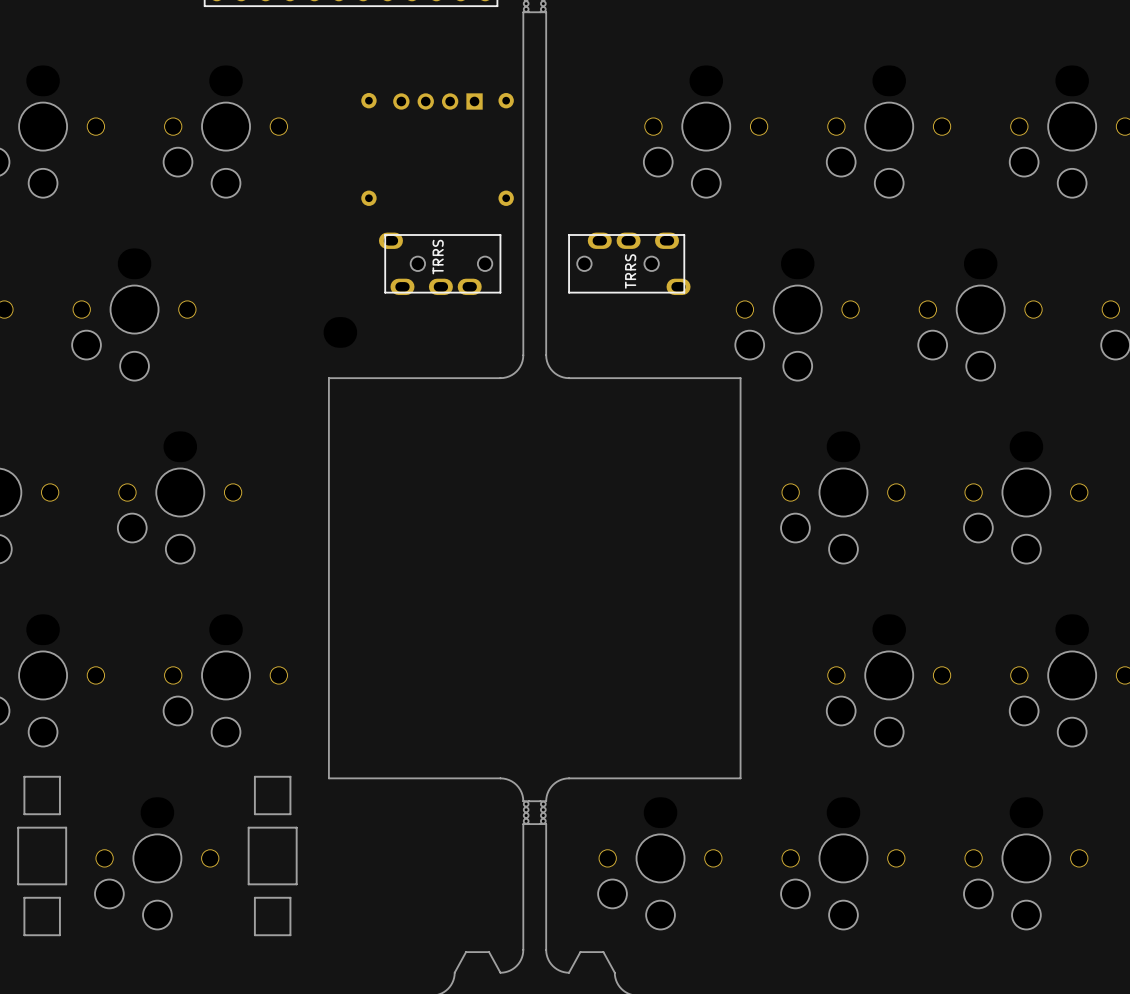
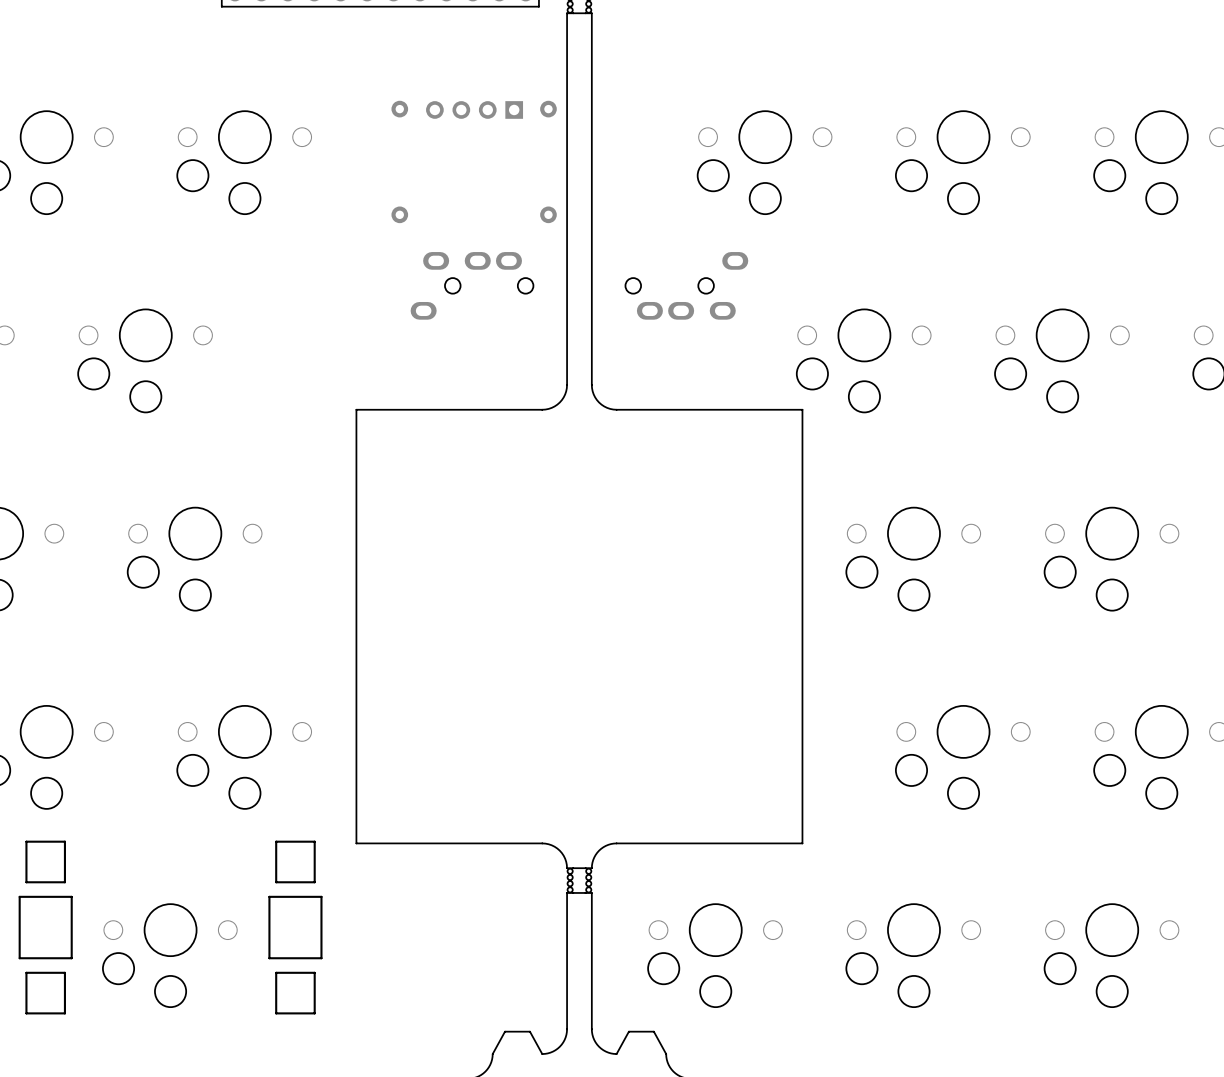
part side: top (440, 263) -> bottom (472, 285)
part side: top (629, 263) -> bottom (686, 285)

